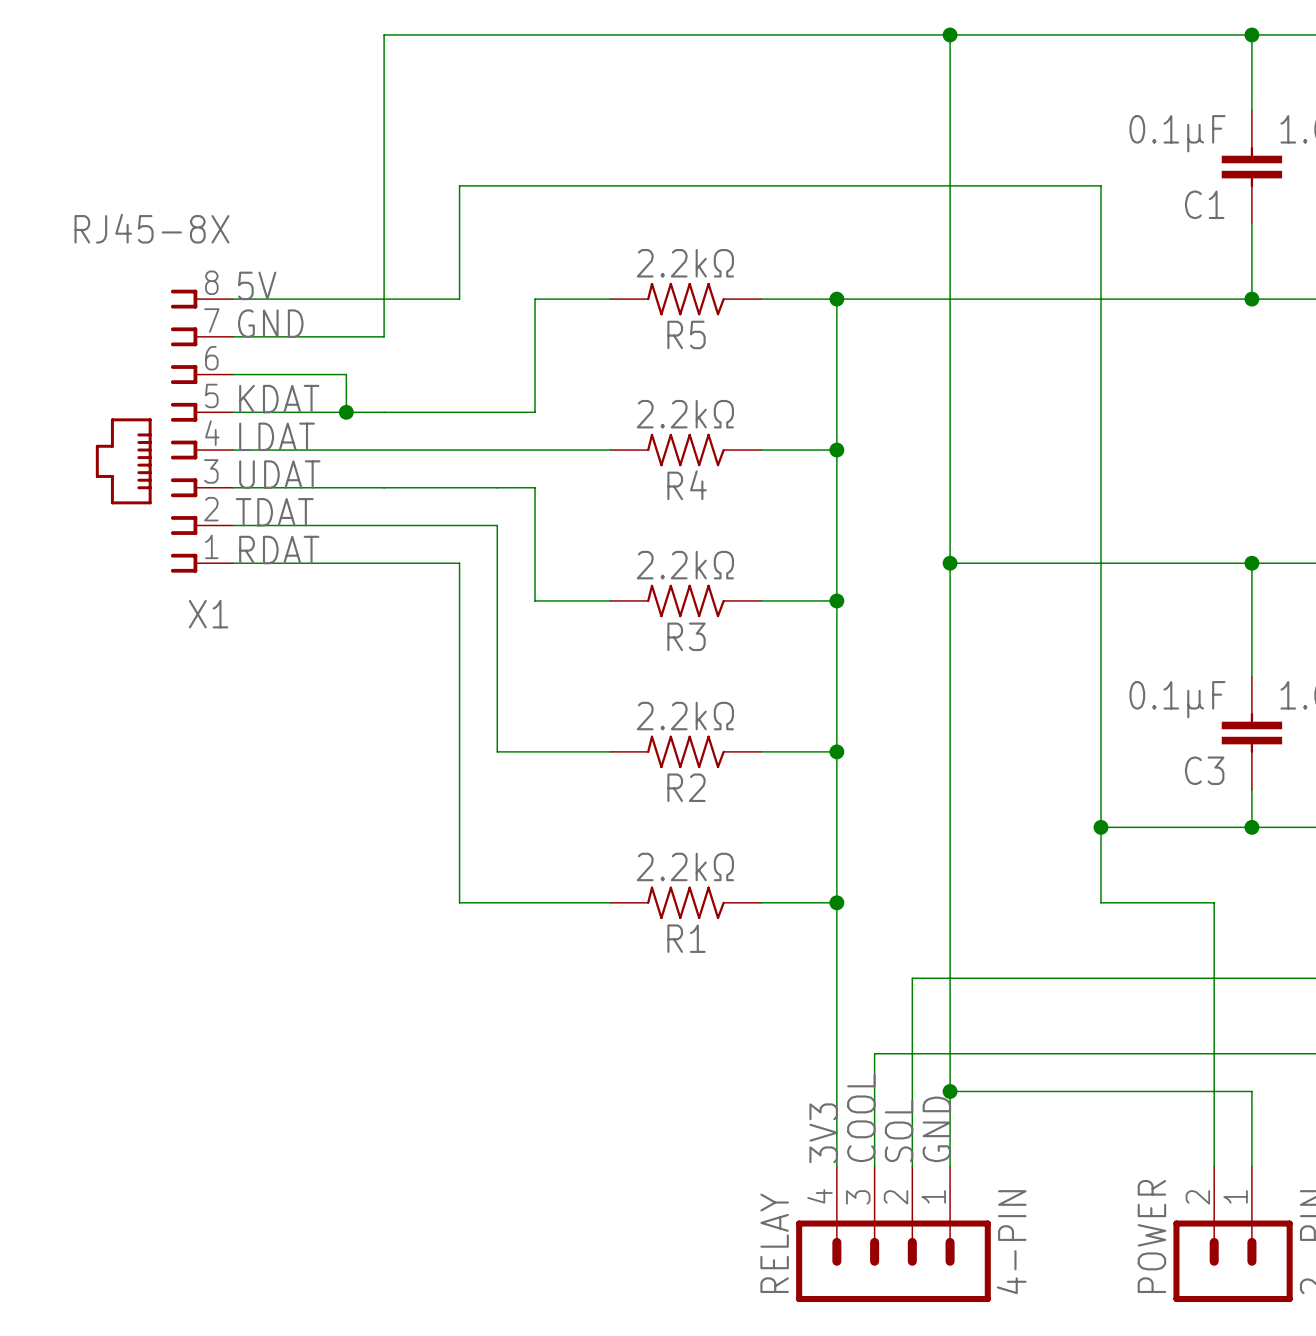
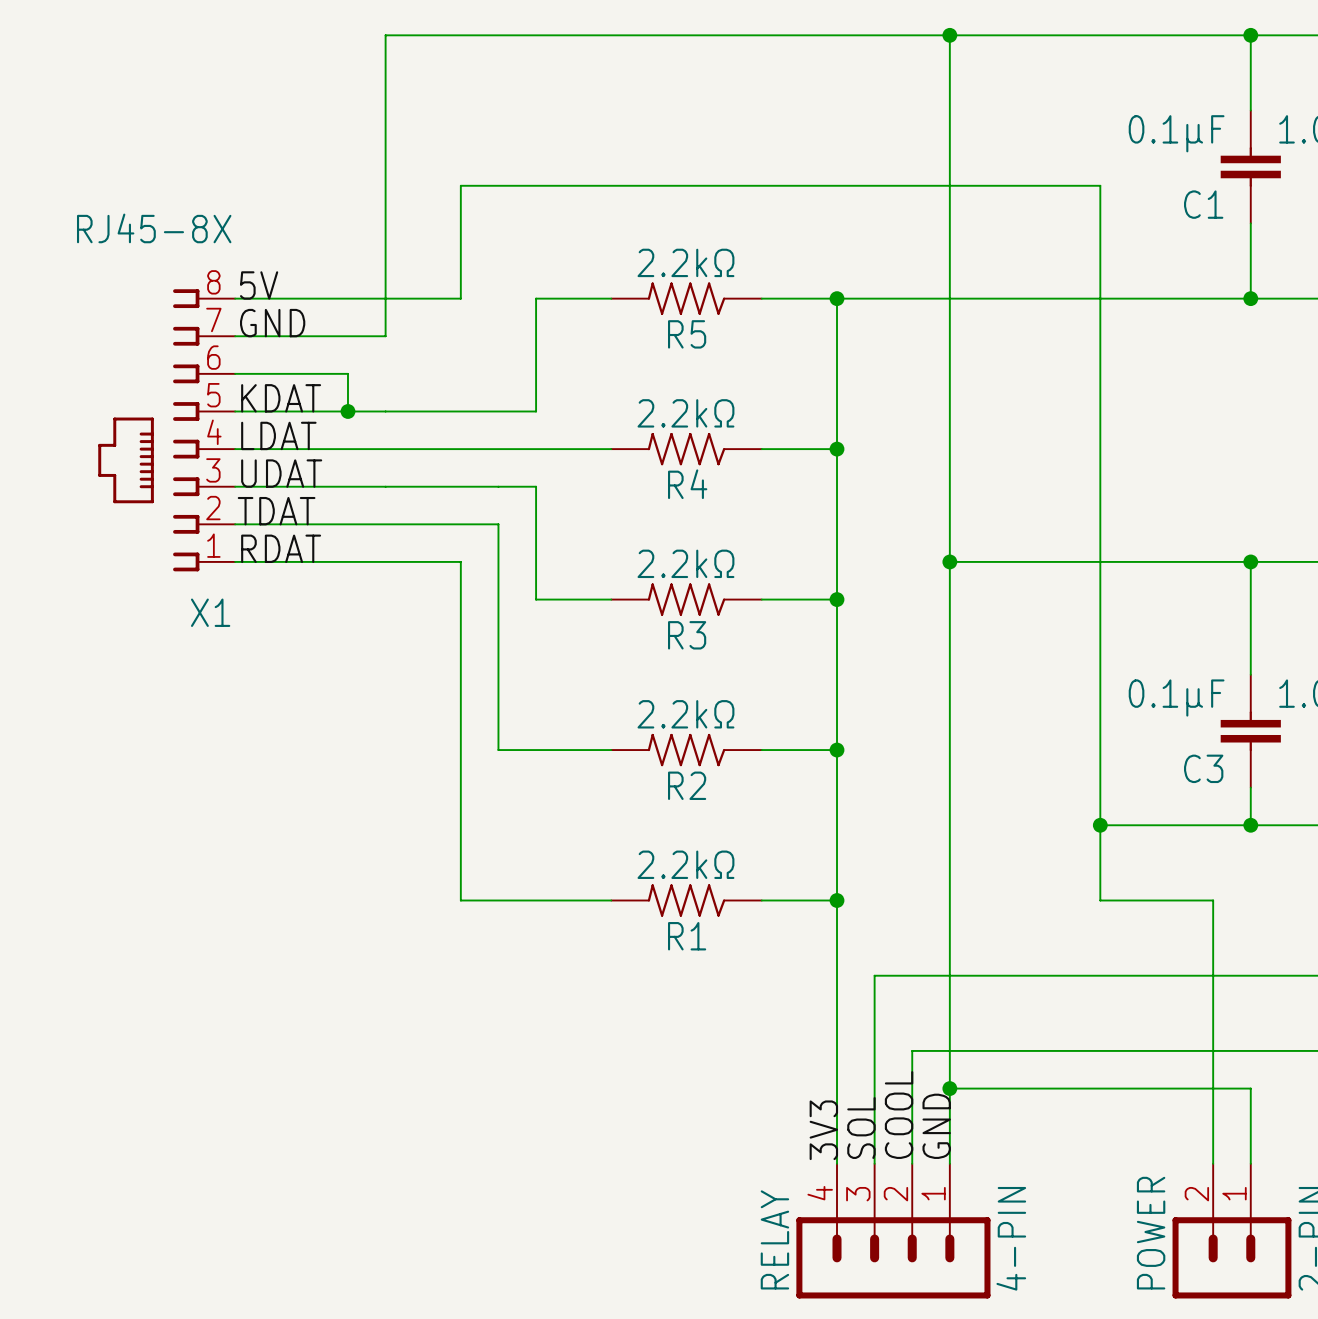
wire: (912, 978) (912, 1053) (874, 1053) -> (912, 975) (874, 975) (874, 1050)
label: COOL (861, 1118) -> SOL (861, 1128)
label: SOL (899, 1131) -> COOL (899, 1115)

